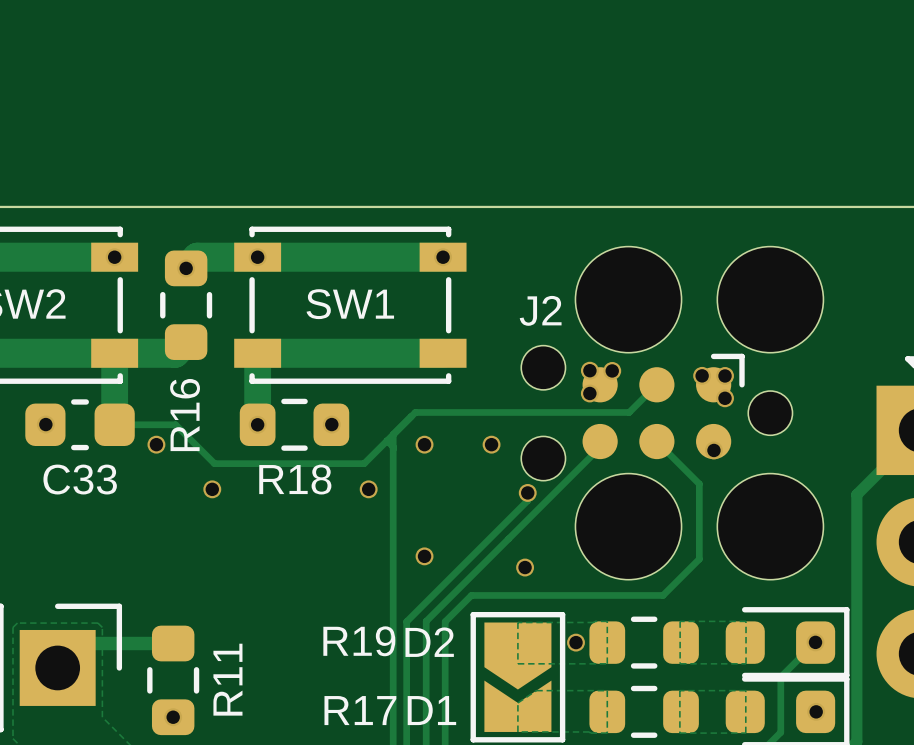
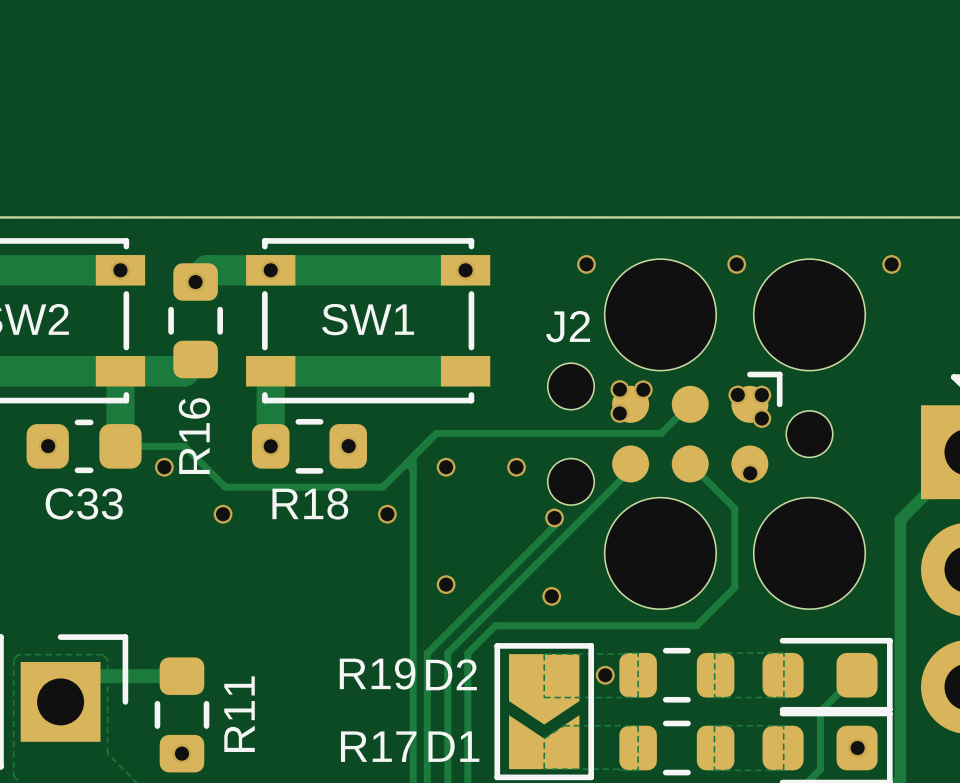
via: none -> (586, 264)
via: none -> (736, 264)
via: none -> (891, 264)
via: (815, 642) -> none

